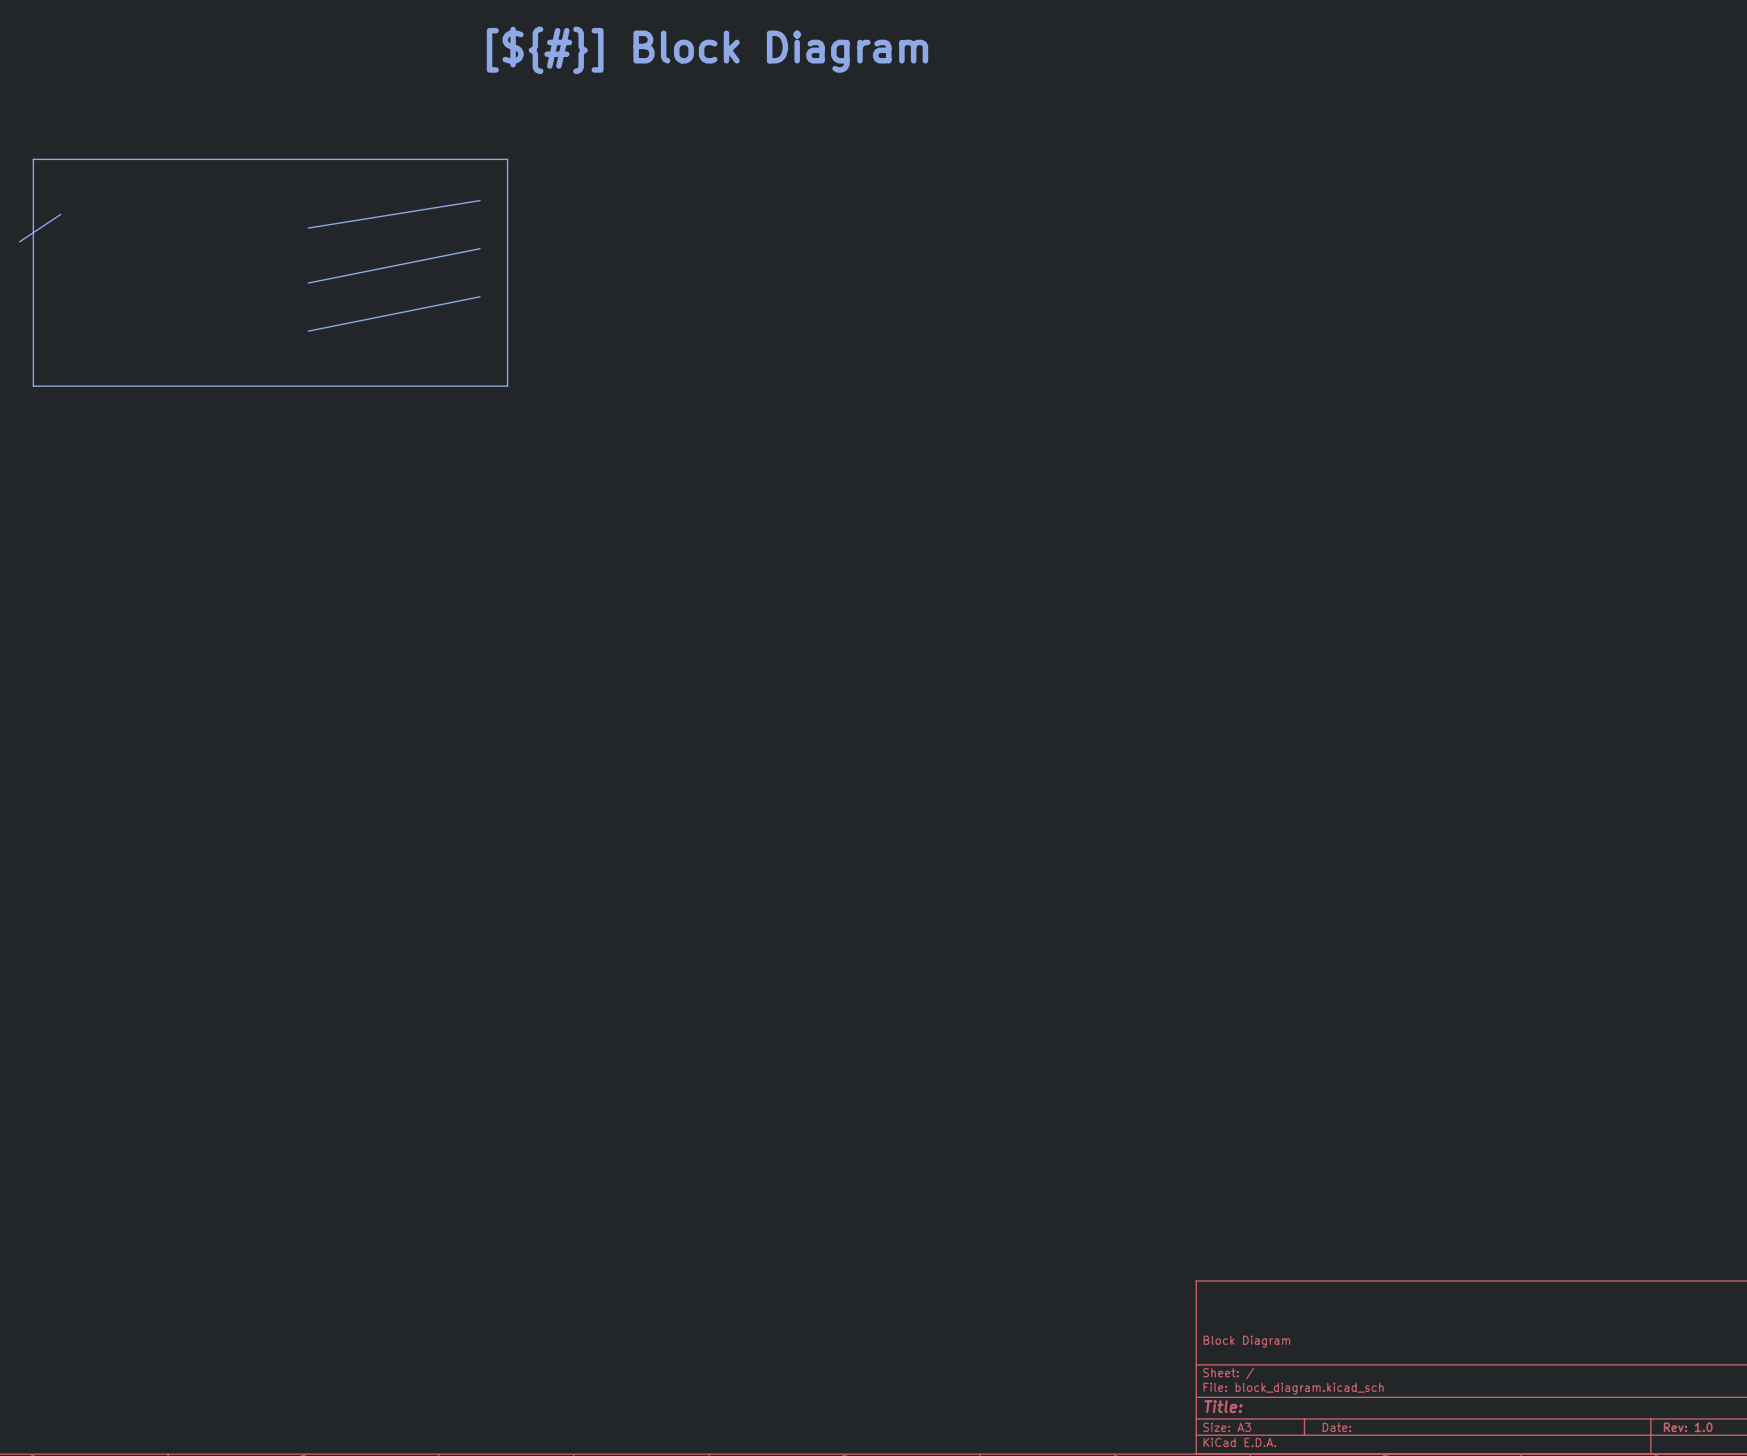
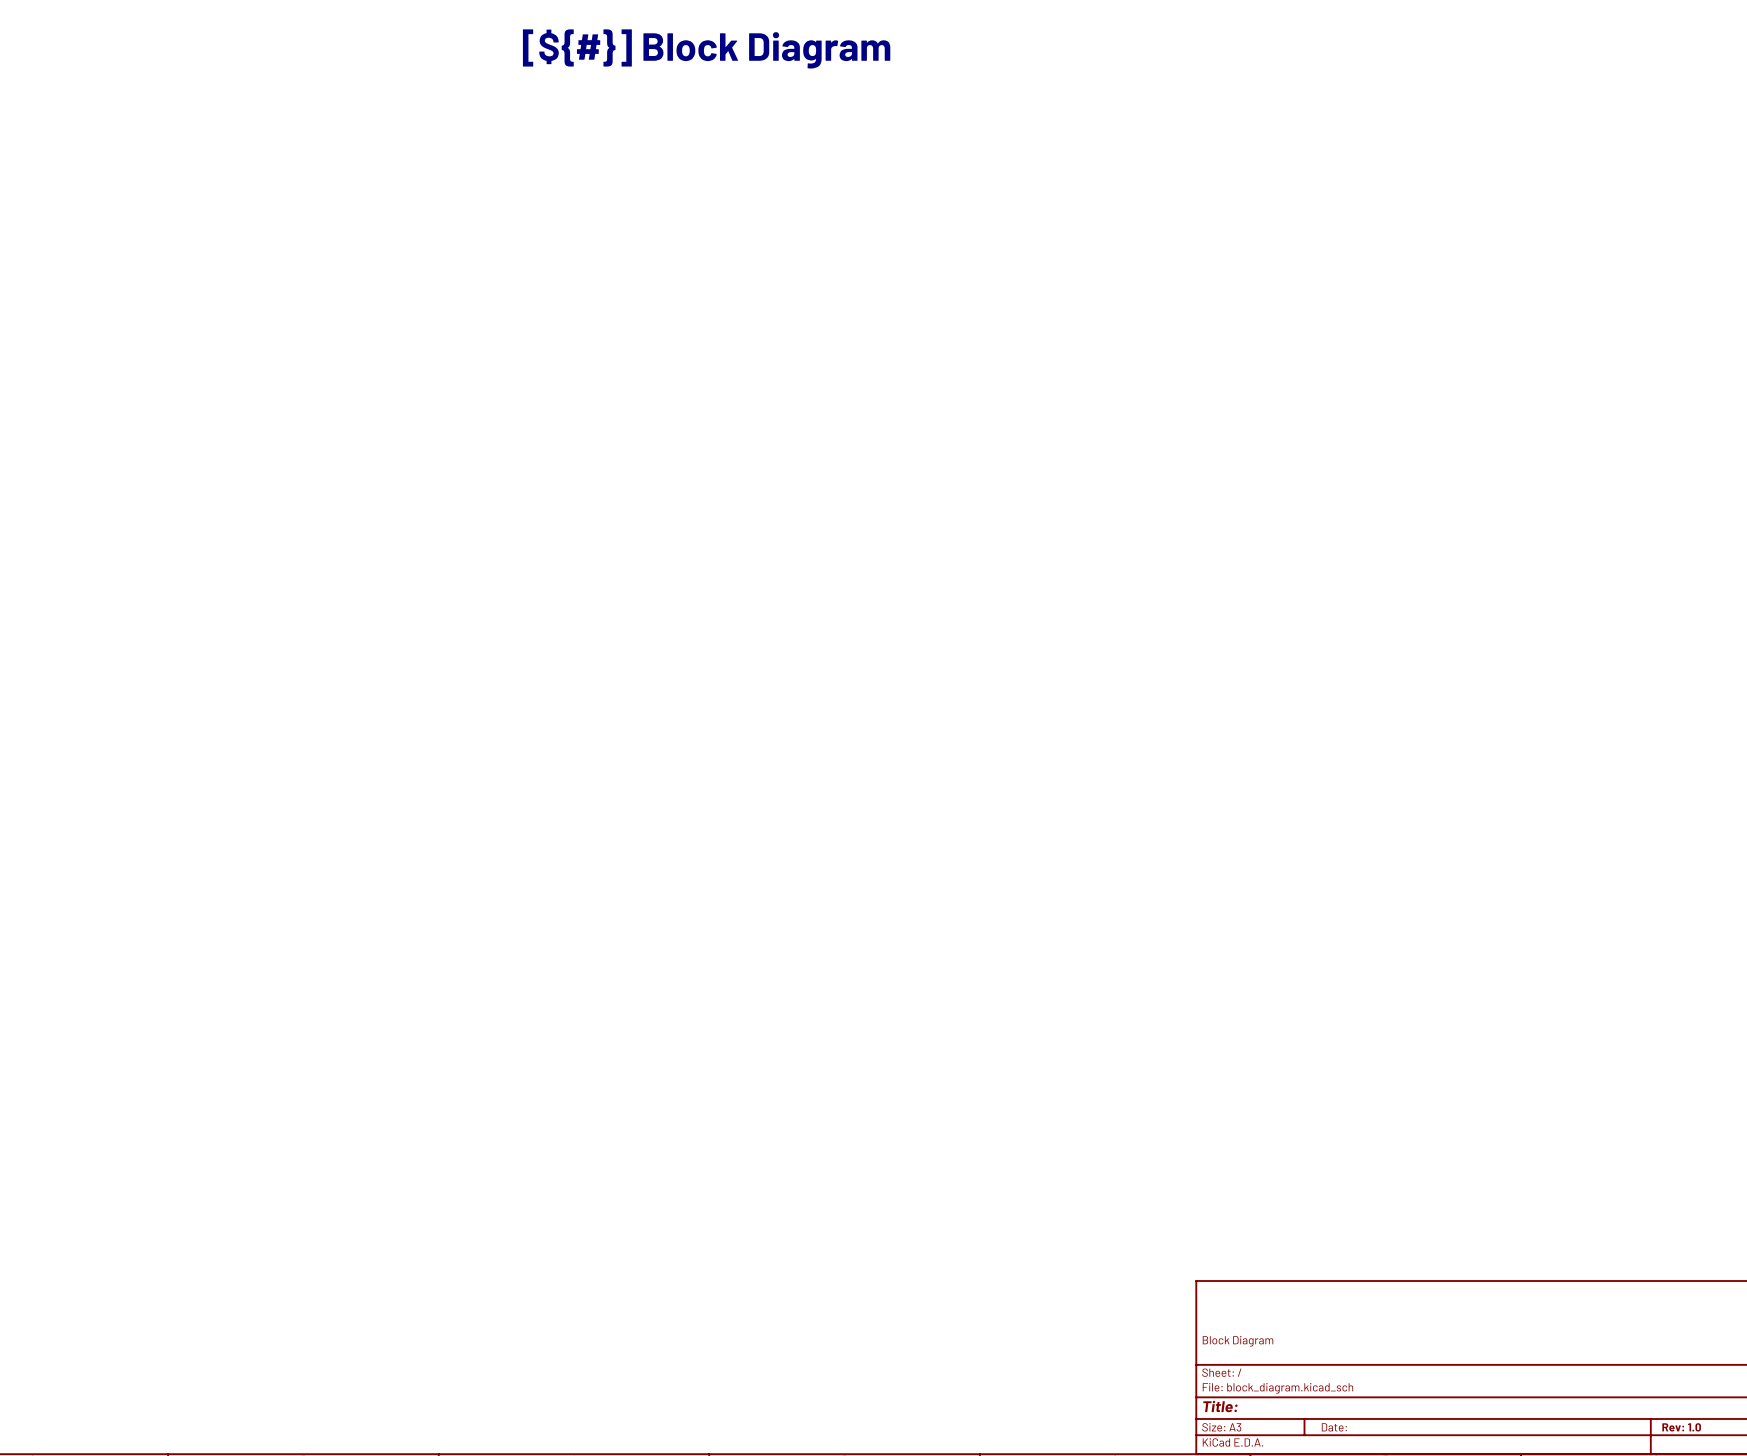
line: (33, 159) (507, 159) (507, 386) (33, 386) (33, 159) -> none
line: (480, 200) (308, 228) -> none
line: (60, 214) (19, 241) -> none
line: (480, 248) (308, 283) -> none
line: (480, 296) (308, 331) -> none

